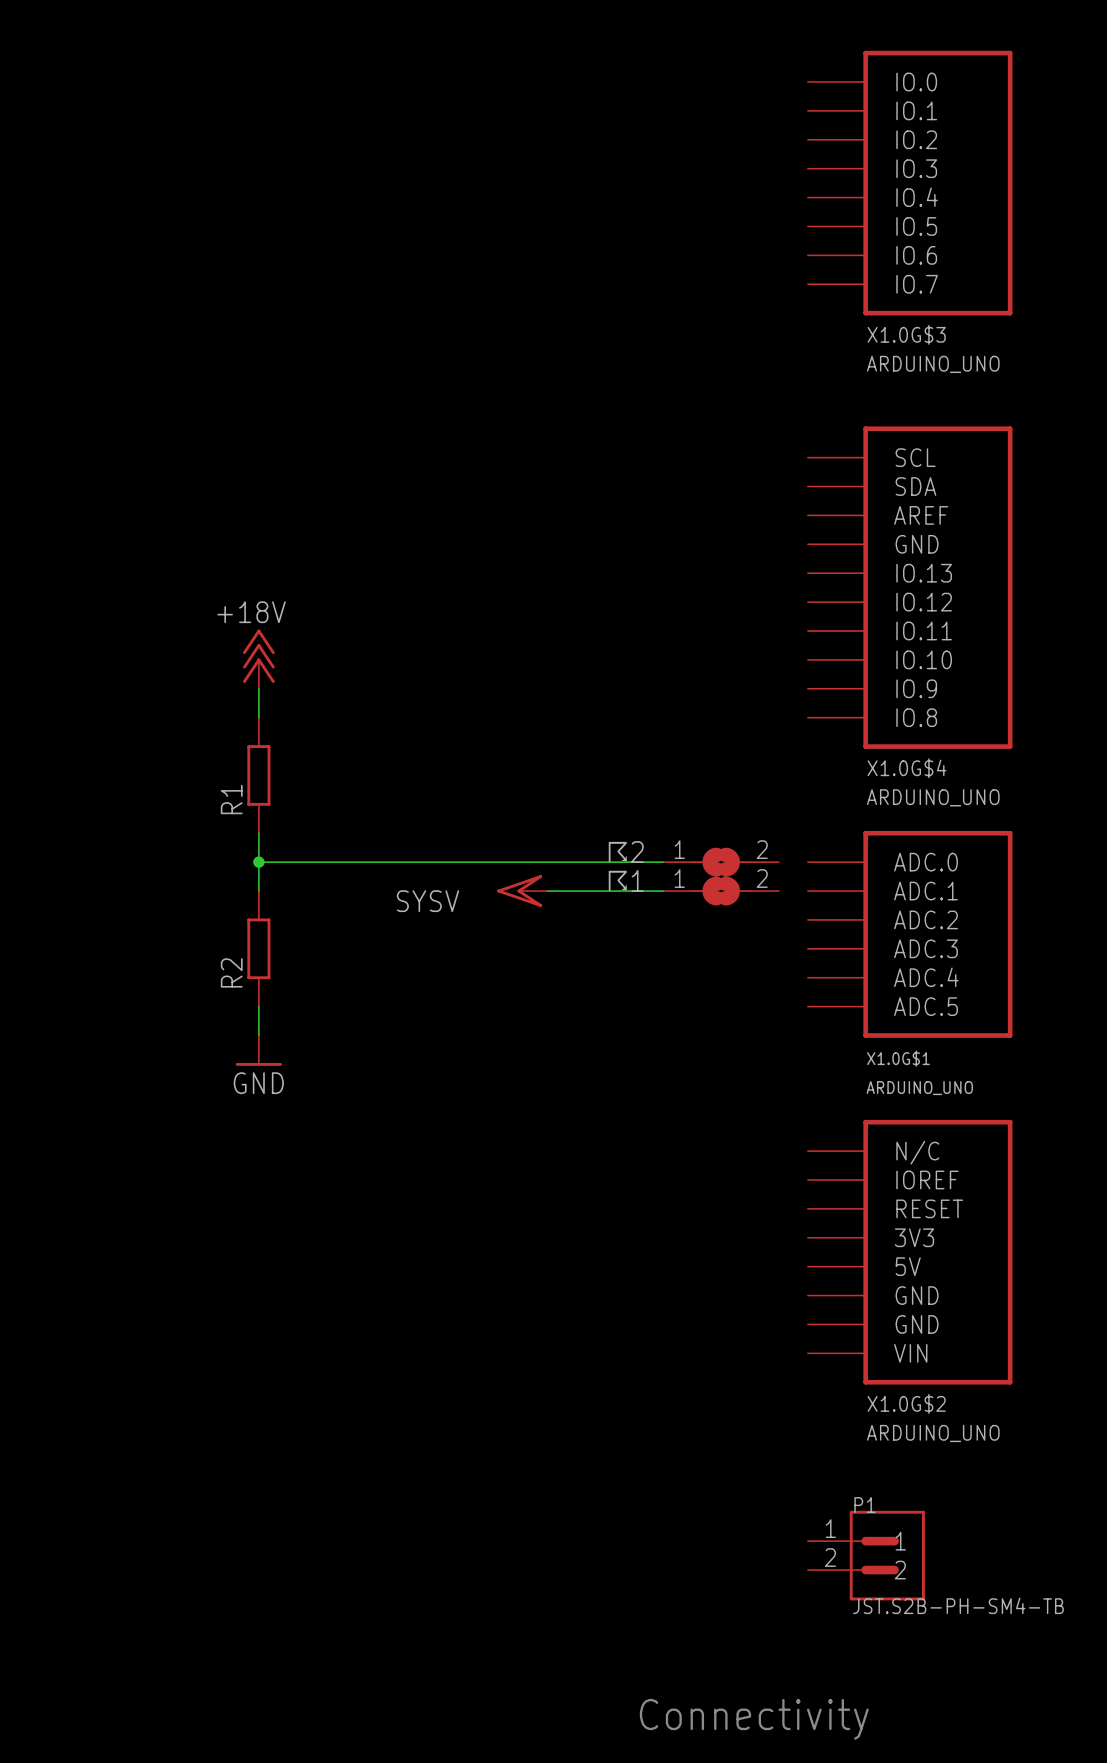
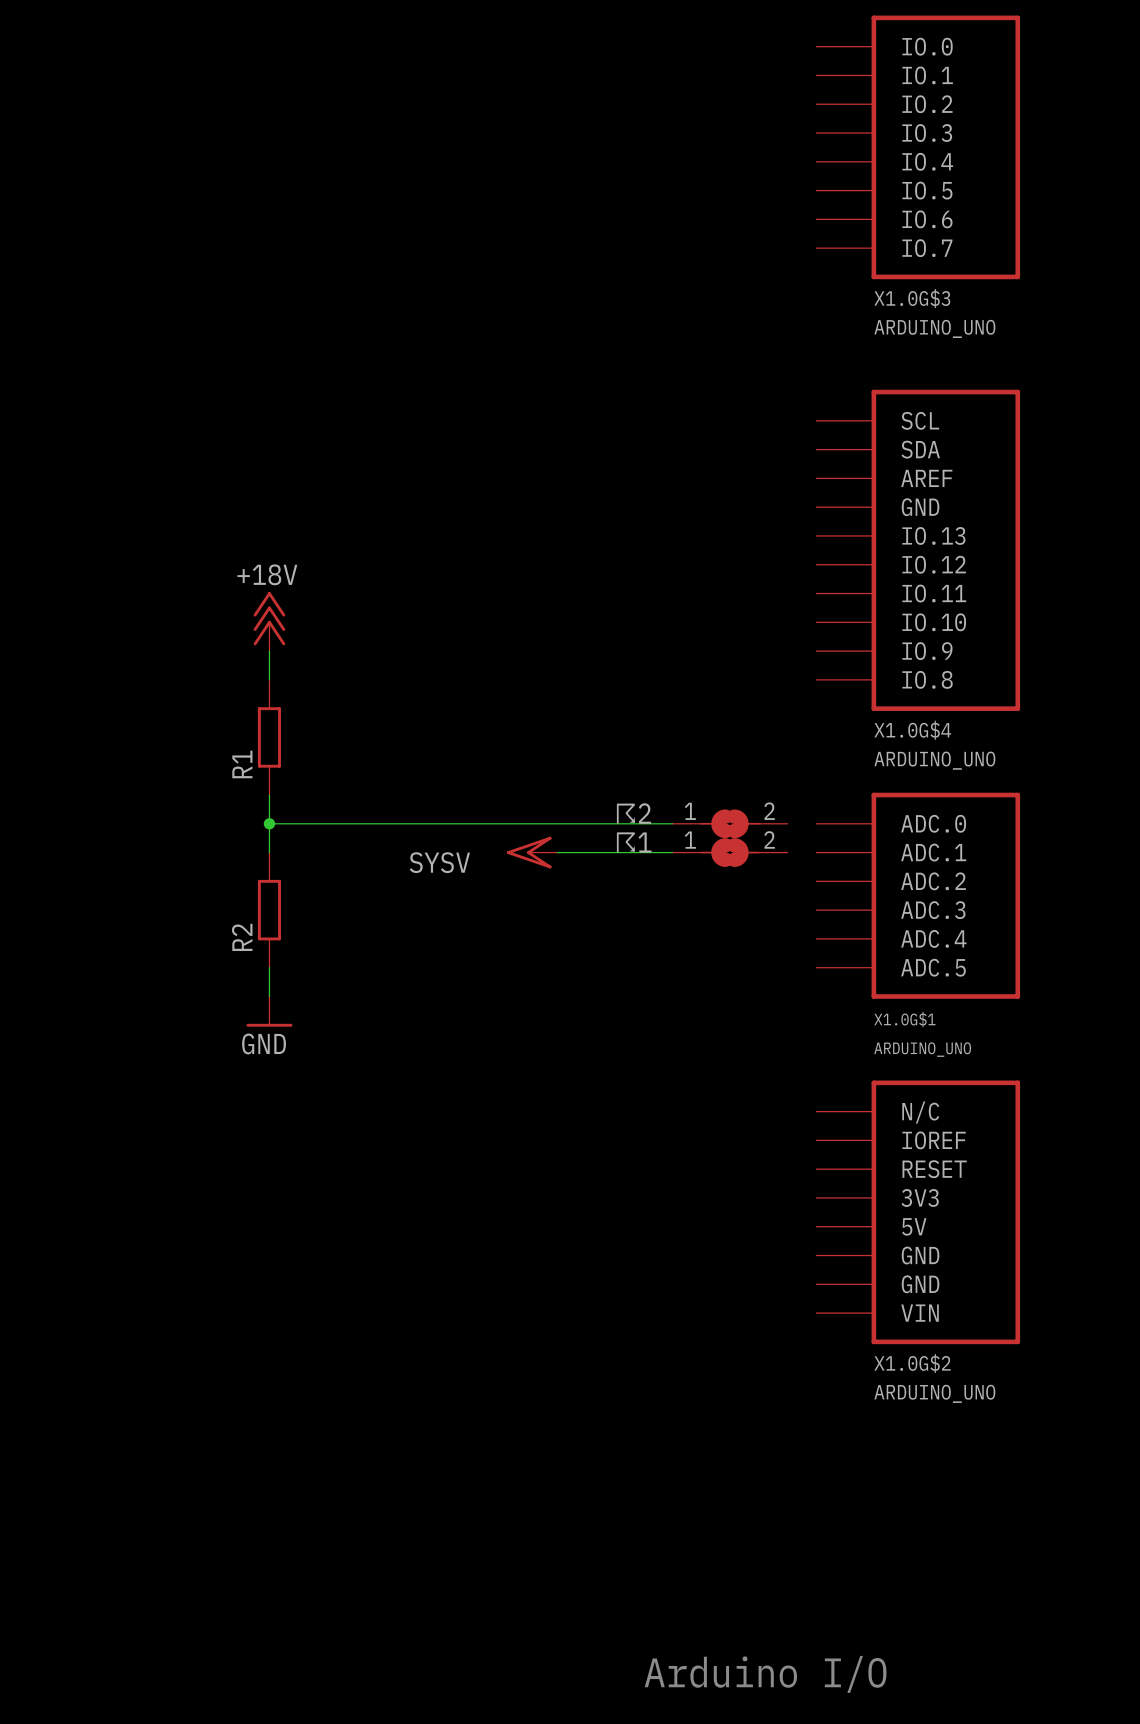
P1: JST.S2B-PH-SM4-TB (866, 1555) -> none
text: Connectivity (754, 1719) -> Arduino I/O (765, 1674)

